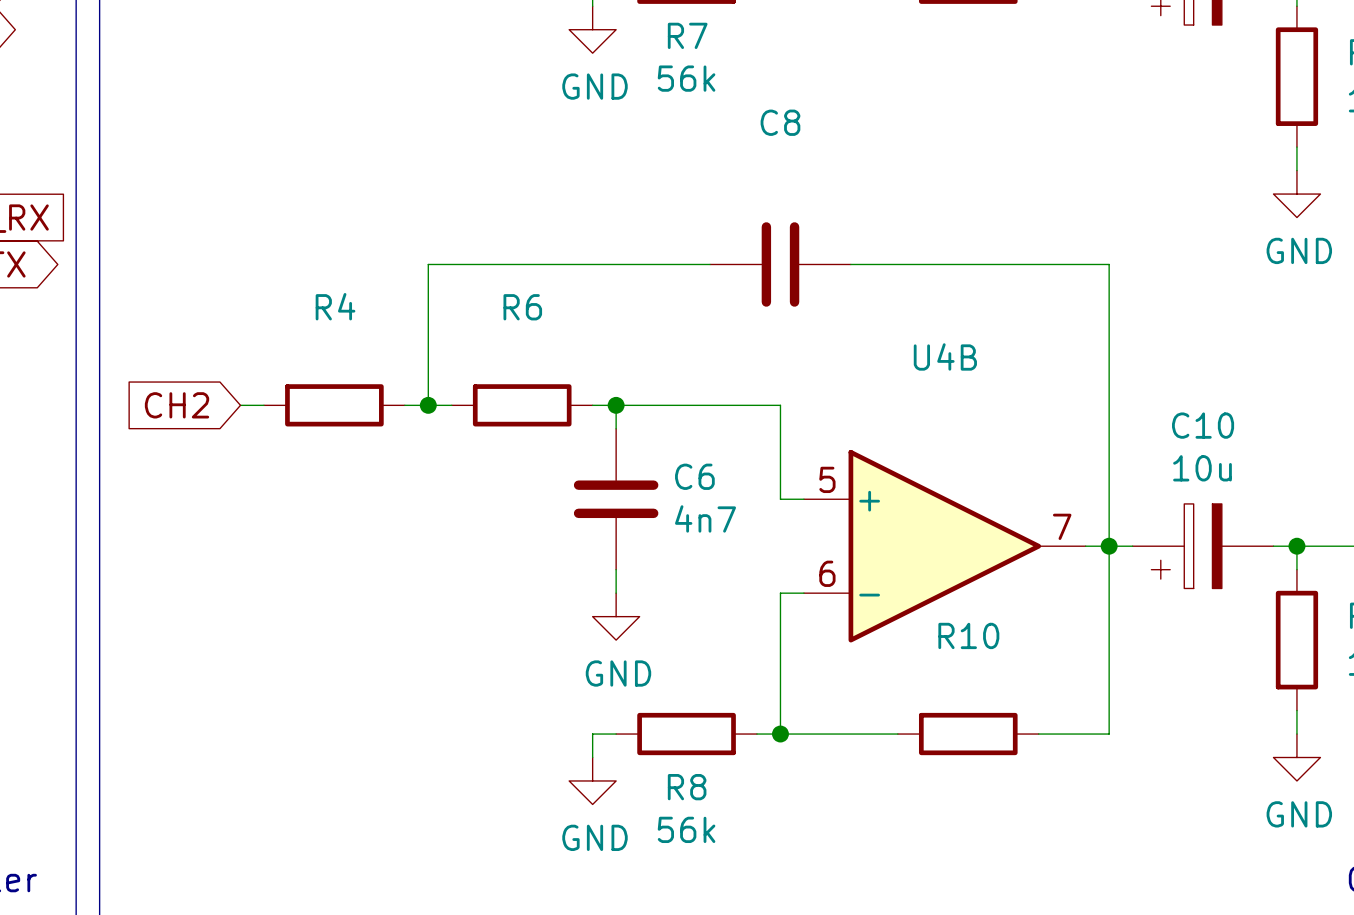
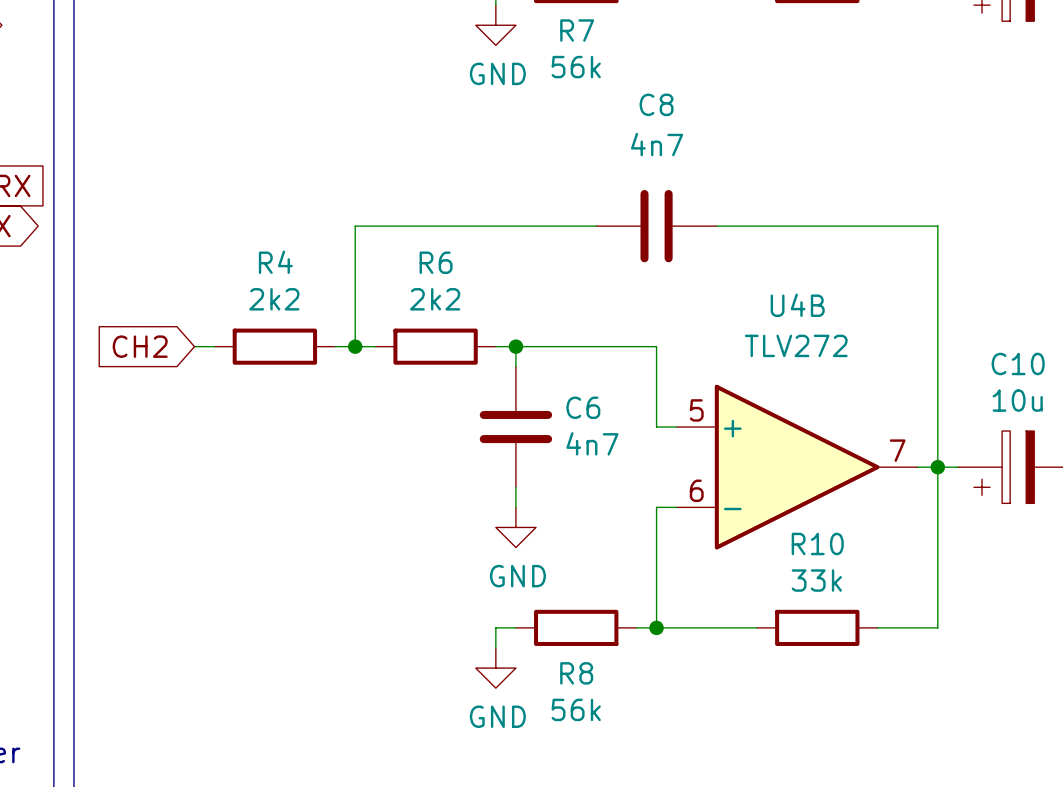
C8 value: none -> 4n7 (657, 144)
R4 value: none -> 2k2 (274, 299)
R6 value: none -> 2k2 (435, 299)
U4B value: none -> TLV272 (796, 345)
R10 value: none -> 33k (816, 580)

